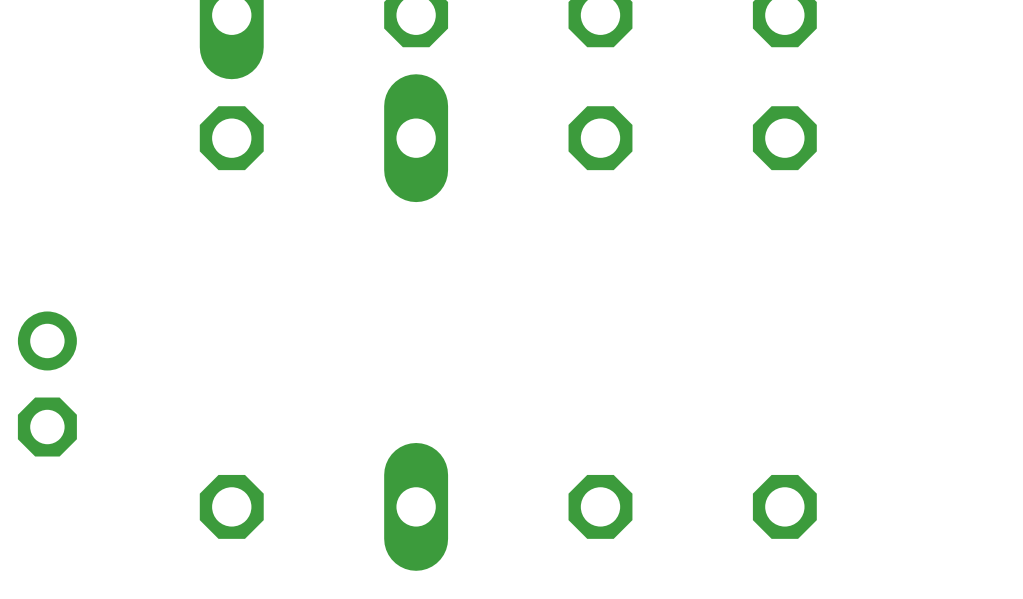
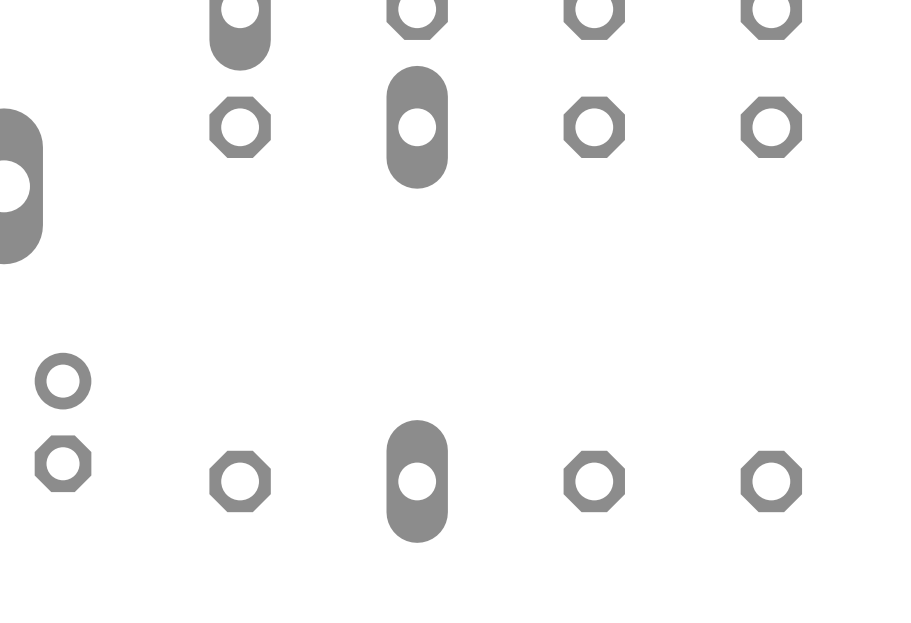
part position: (47, 383) -> (63, 422)

